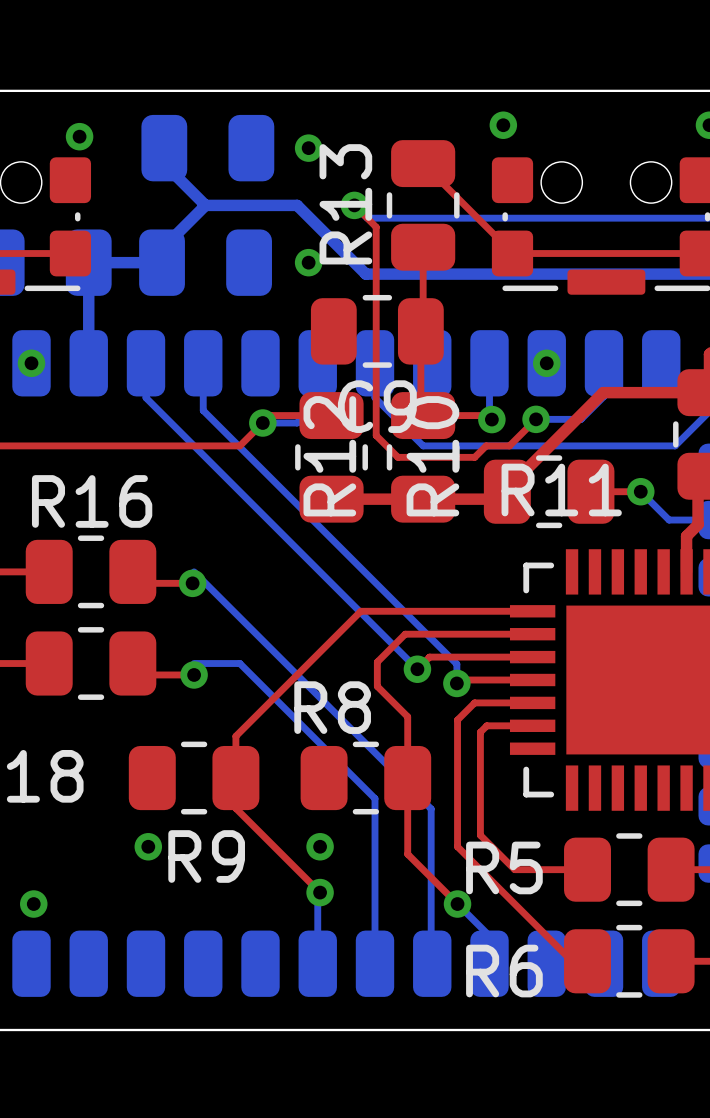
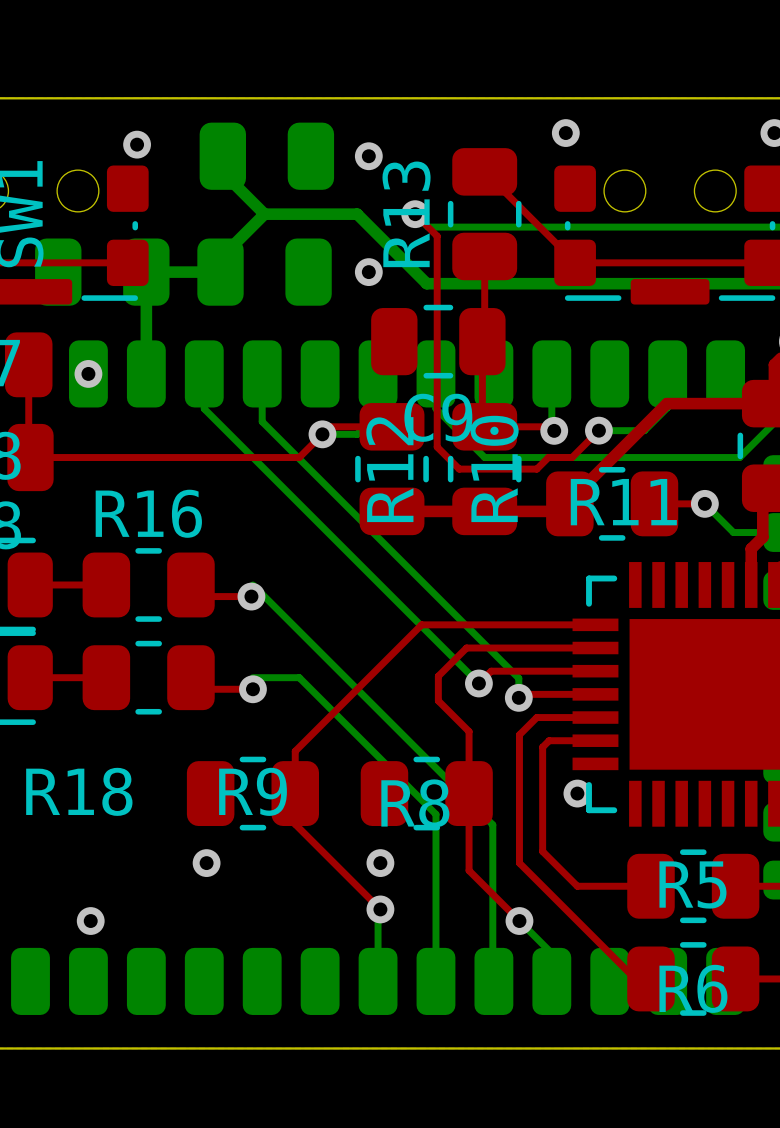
via: (546, 363) -> none
R8 name position: R8 (332, 707) -> R8 (415, 803)
via: none -> (577, 793)
R9 name position: R9 (206, 856) -> R9 (253, 791)
R5 name position: R5 (504, 867) -> R5 (692, 884)
R6 name position: R6 (504, 971) -> R6 (693, 988)

